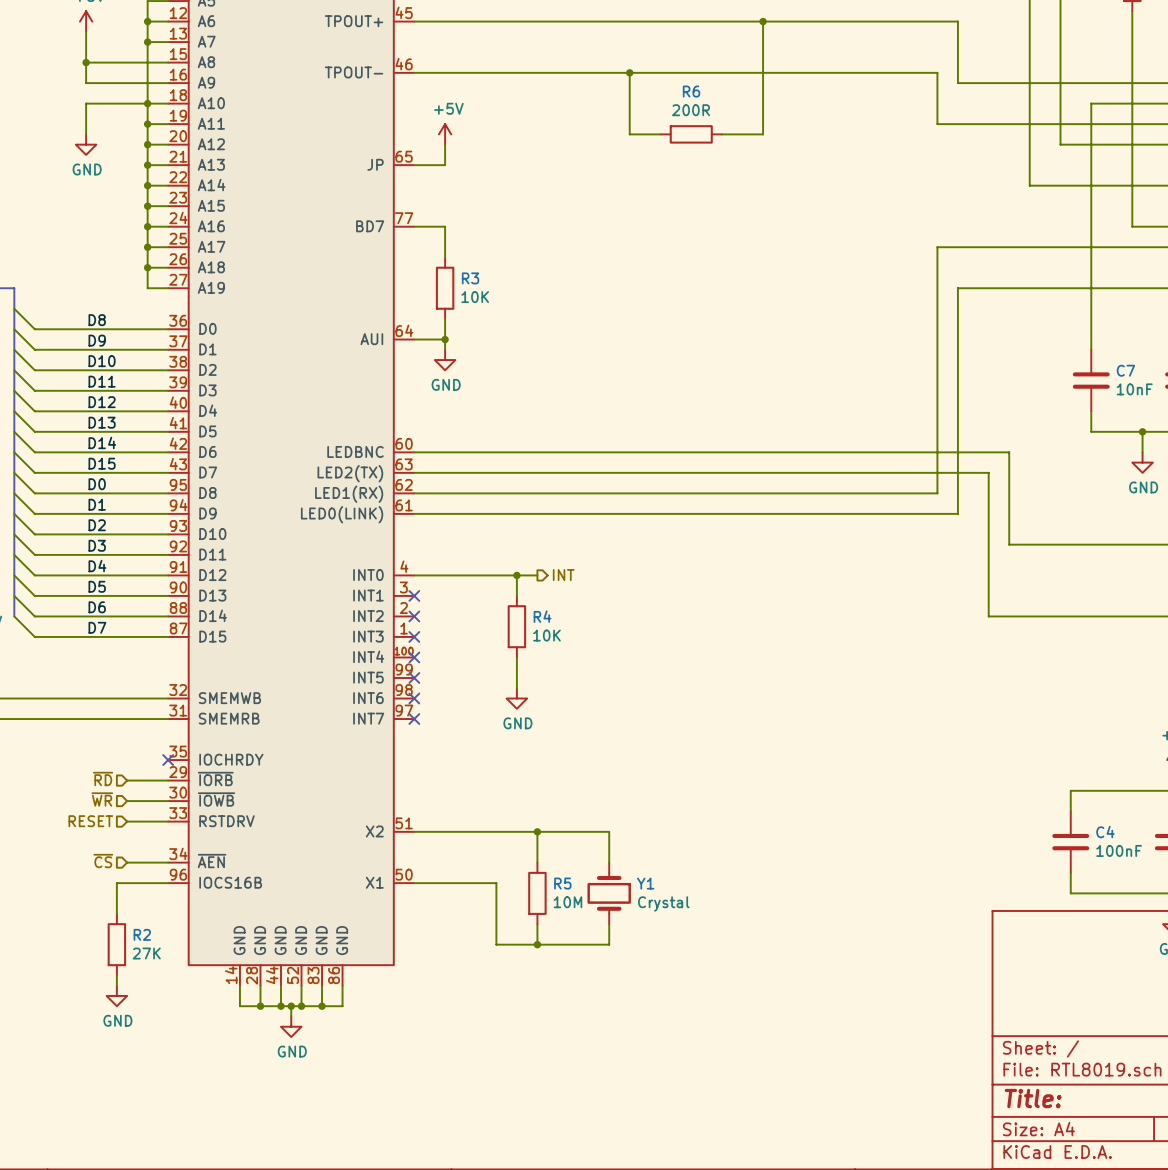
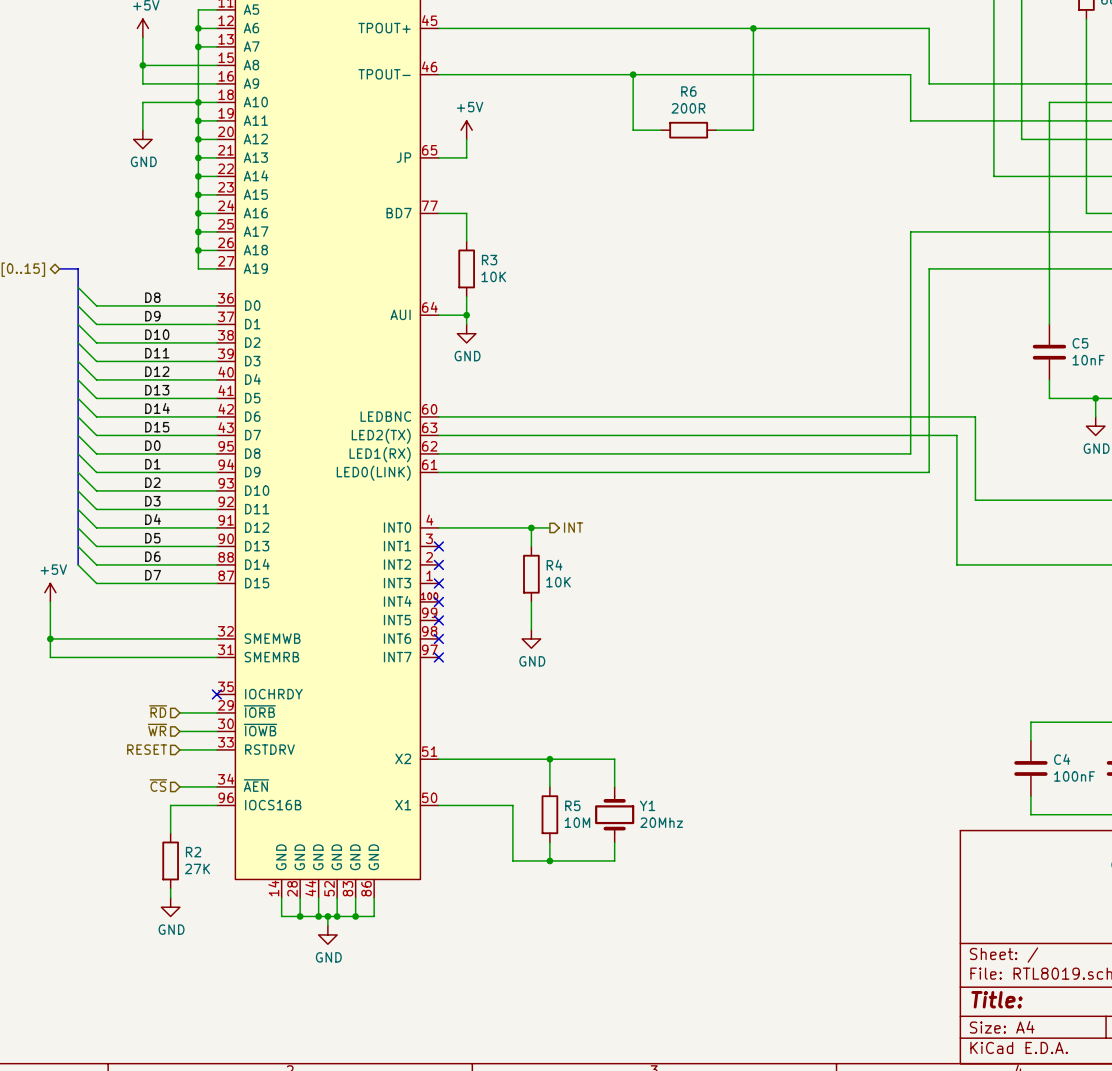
C7 name: C7 (1125, 370) -> C5 (1080, 343)
Y1 value: Crystal (663, 903) -> 20Mhz (661, 822)

